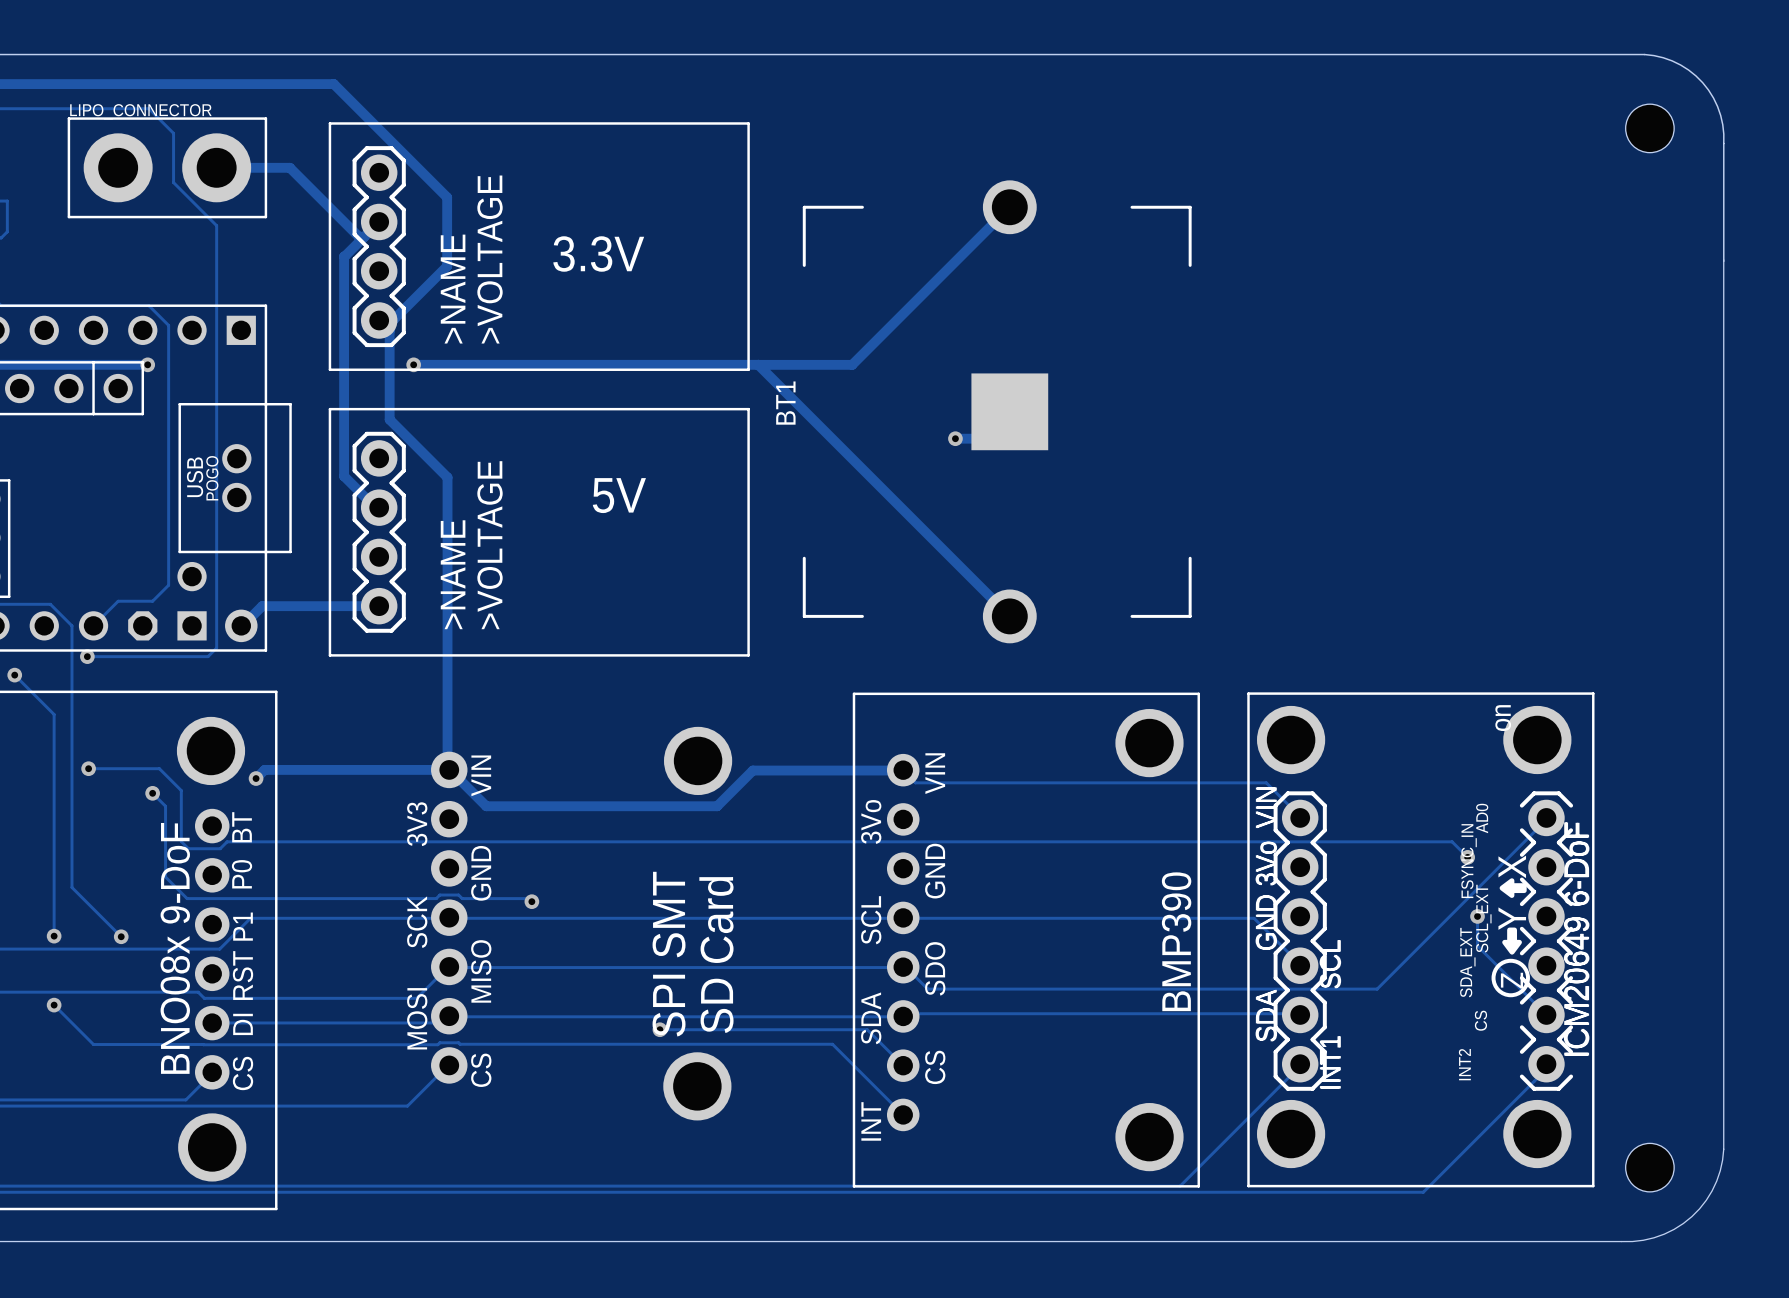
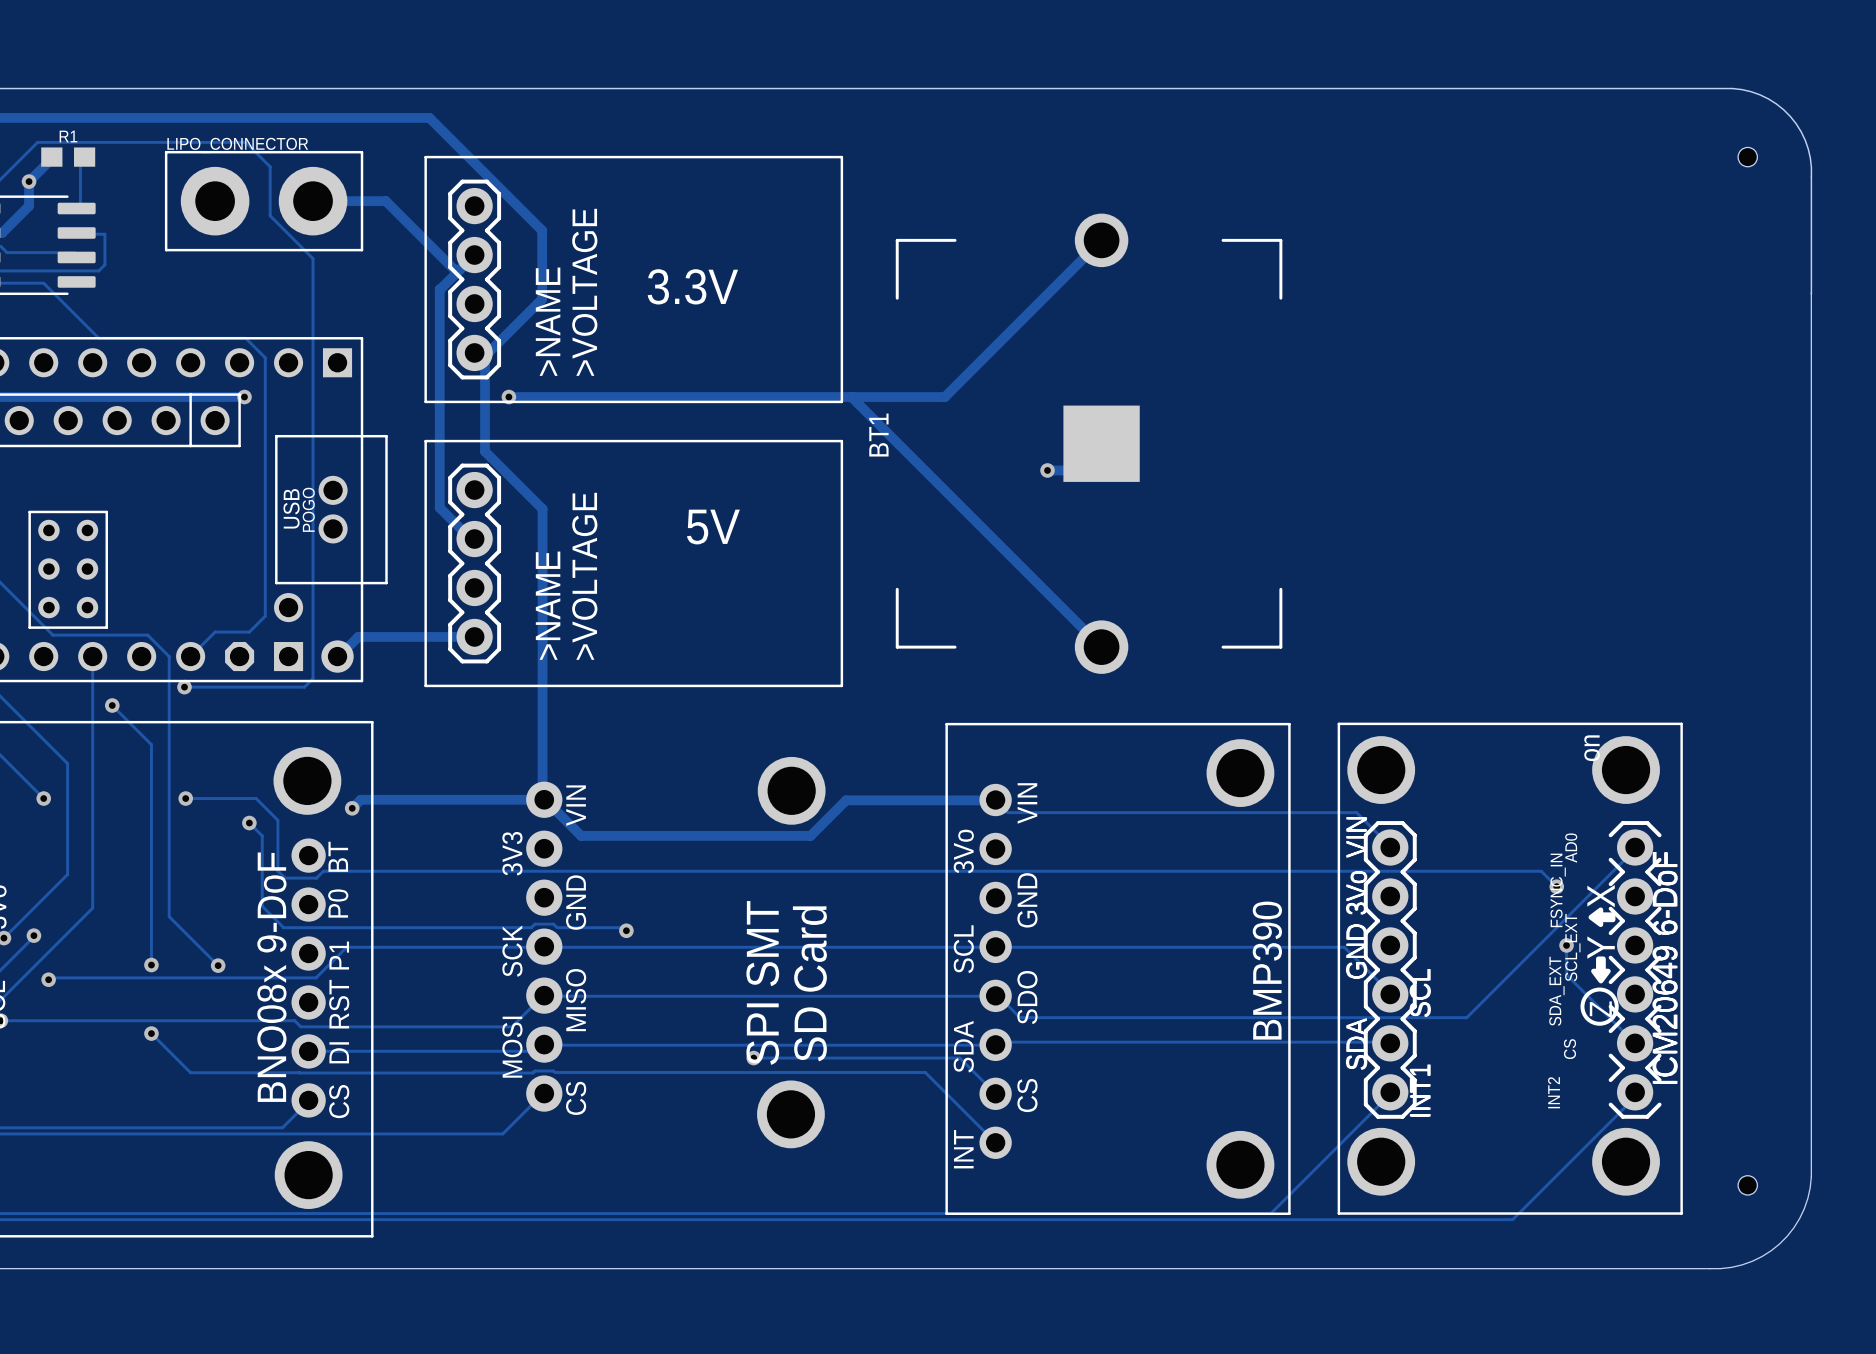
hole size: [1625, 104, 1675, 153] -> [1738, 147, 1758, 167]
hole size: [1625, 1143, 1675, 1192] -> [1738, 1175, 1758, 1196]

